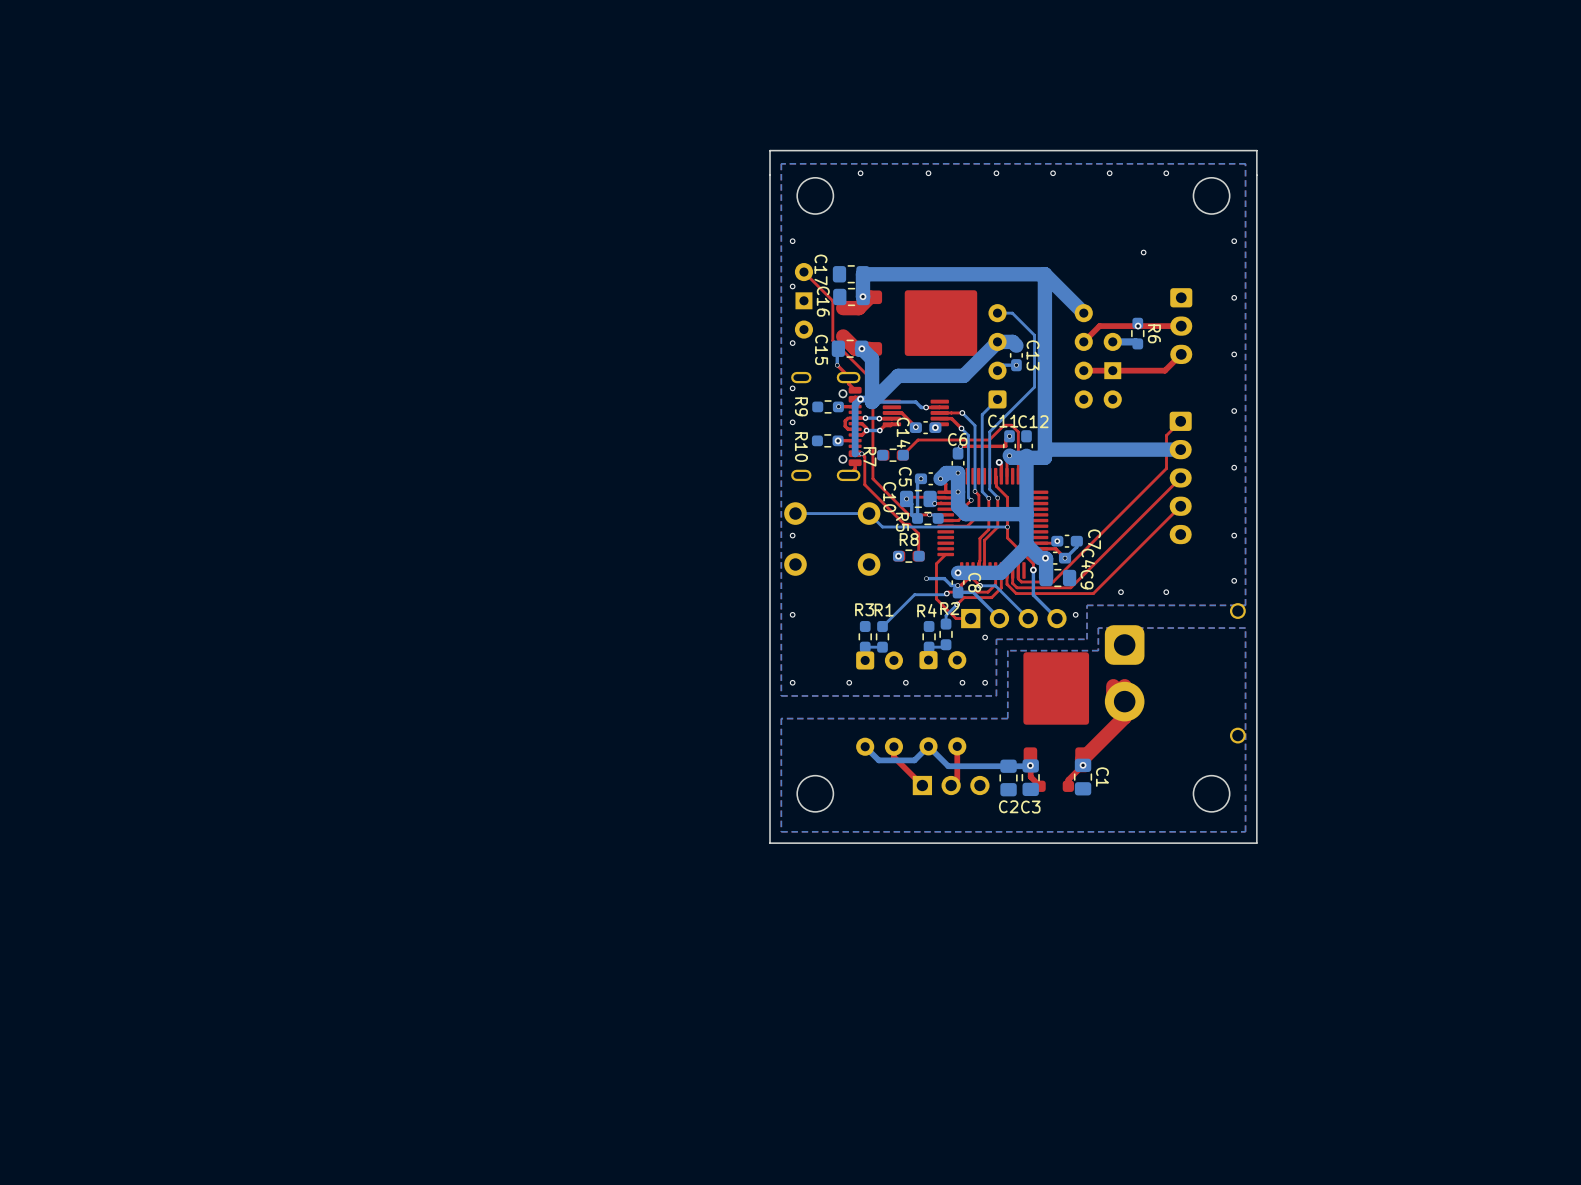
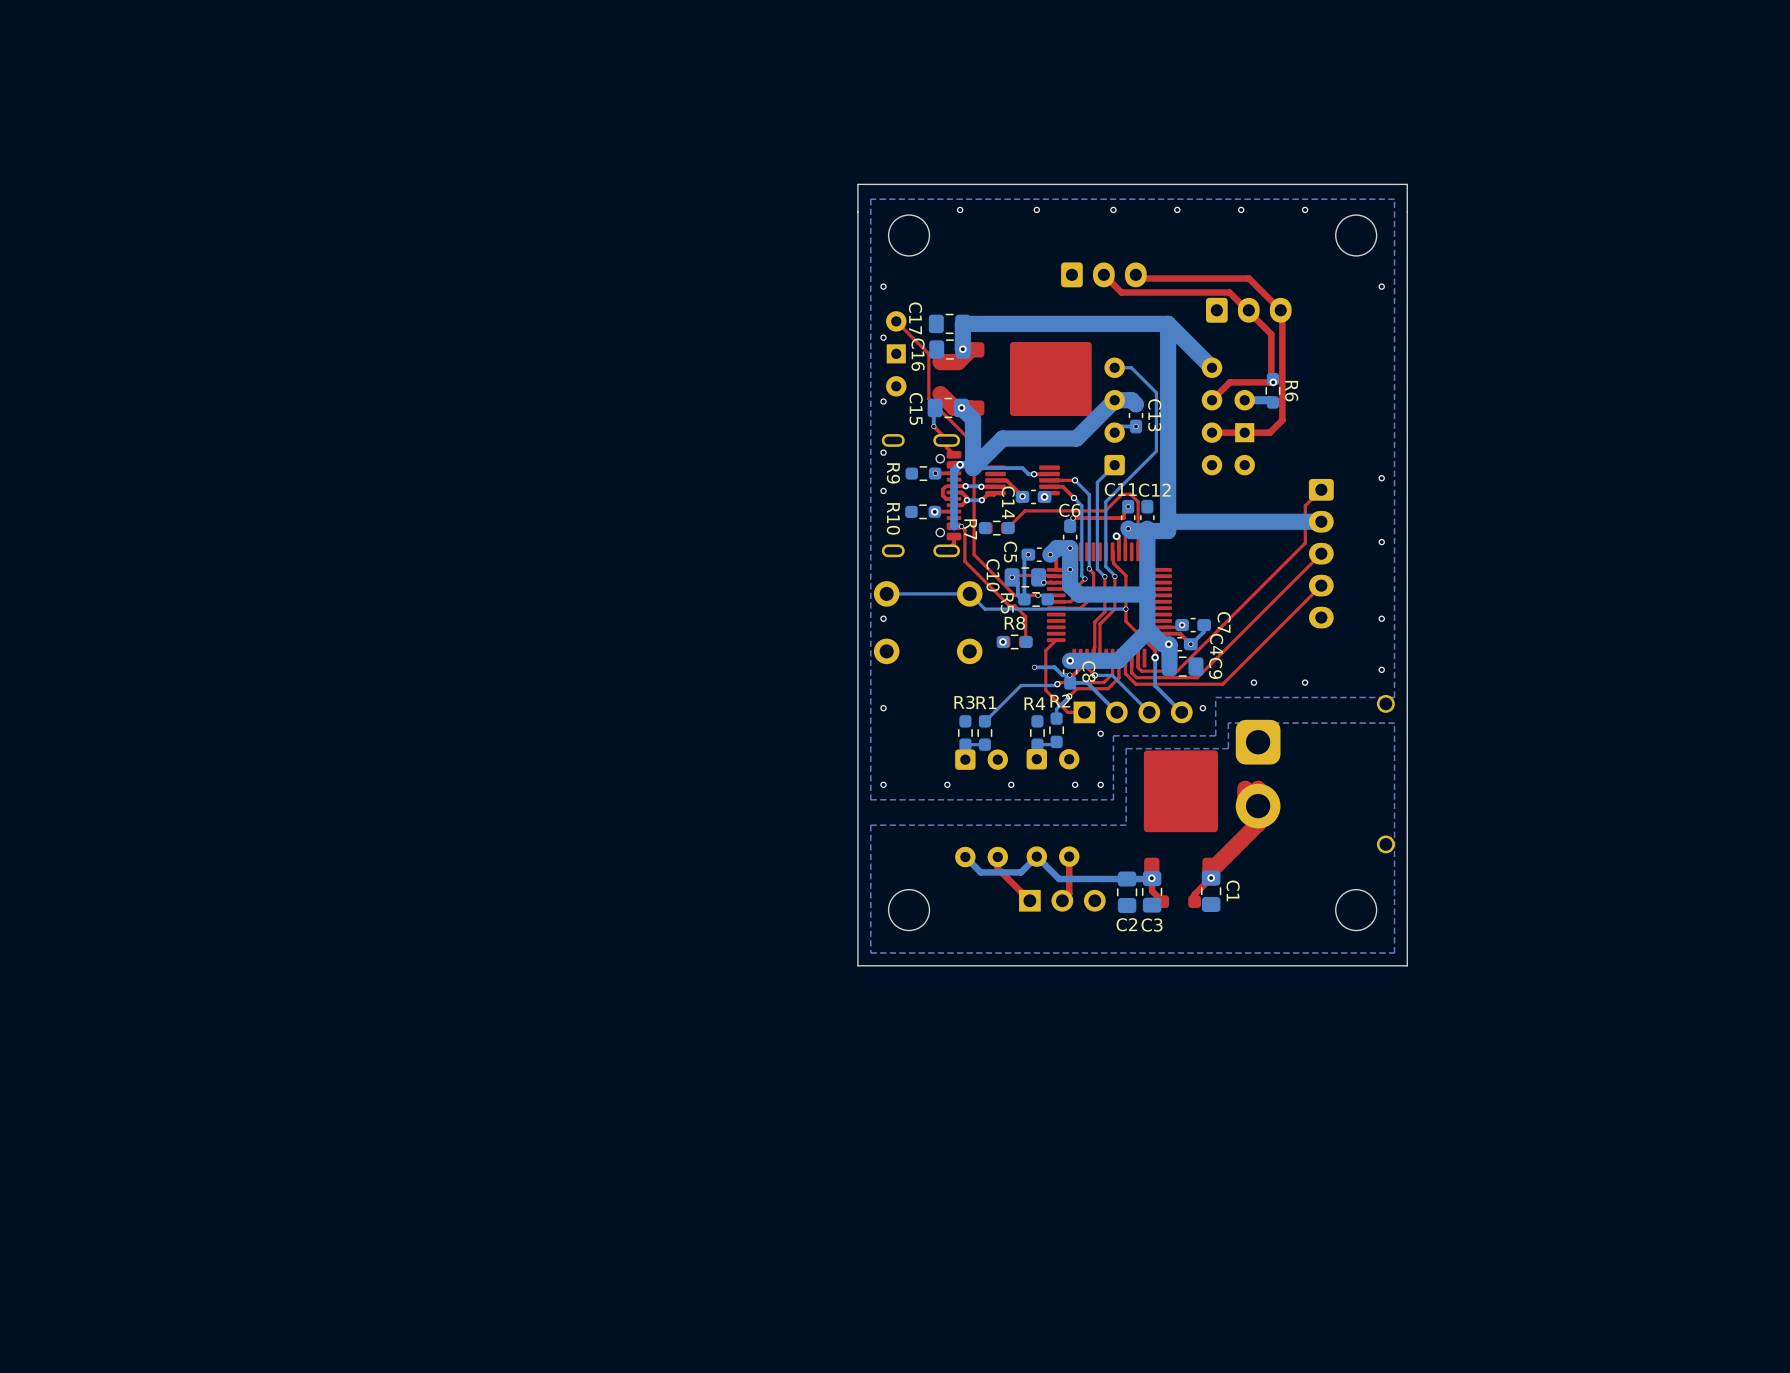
part: none -> (1103, 274)
top track: none -> (1135, 274) (1139, 278) (1248, 278) (1280, 310)
via: (1143, 252) -> none
via: (1234, 297) -> none
top track: (1181, 326) (1134, 326) -> (1103, 274) (1121, 292) (1229, 292) (1271, 334) (1271, 380) (1269, 382)
part rotation: 0° (1181, 326) -> 90° counterclockwise (1248, 310)
part position: (1181, 326) -> (1248, 310)
top track: (1181, 354) (1164, 370) (1135, 370) -> (1282, 311) (1282, 420) (1269, 432)
via: (1234, 354) -> none

